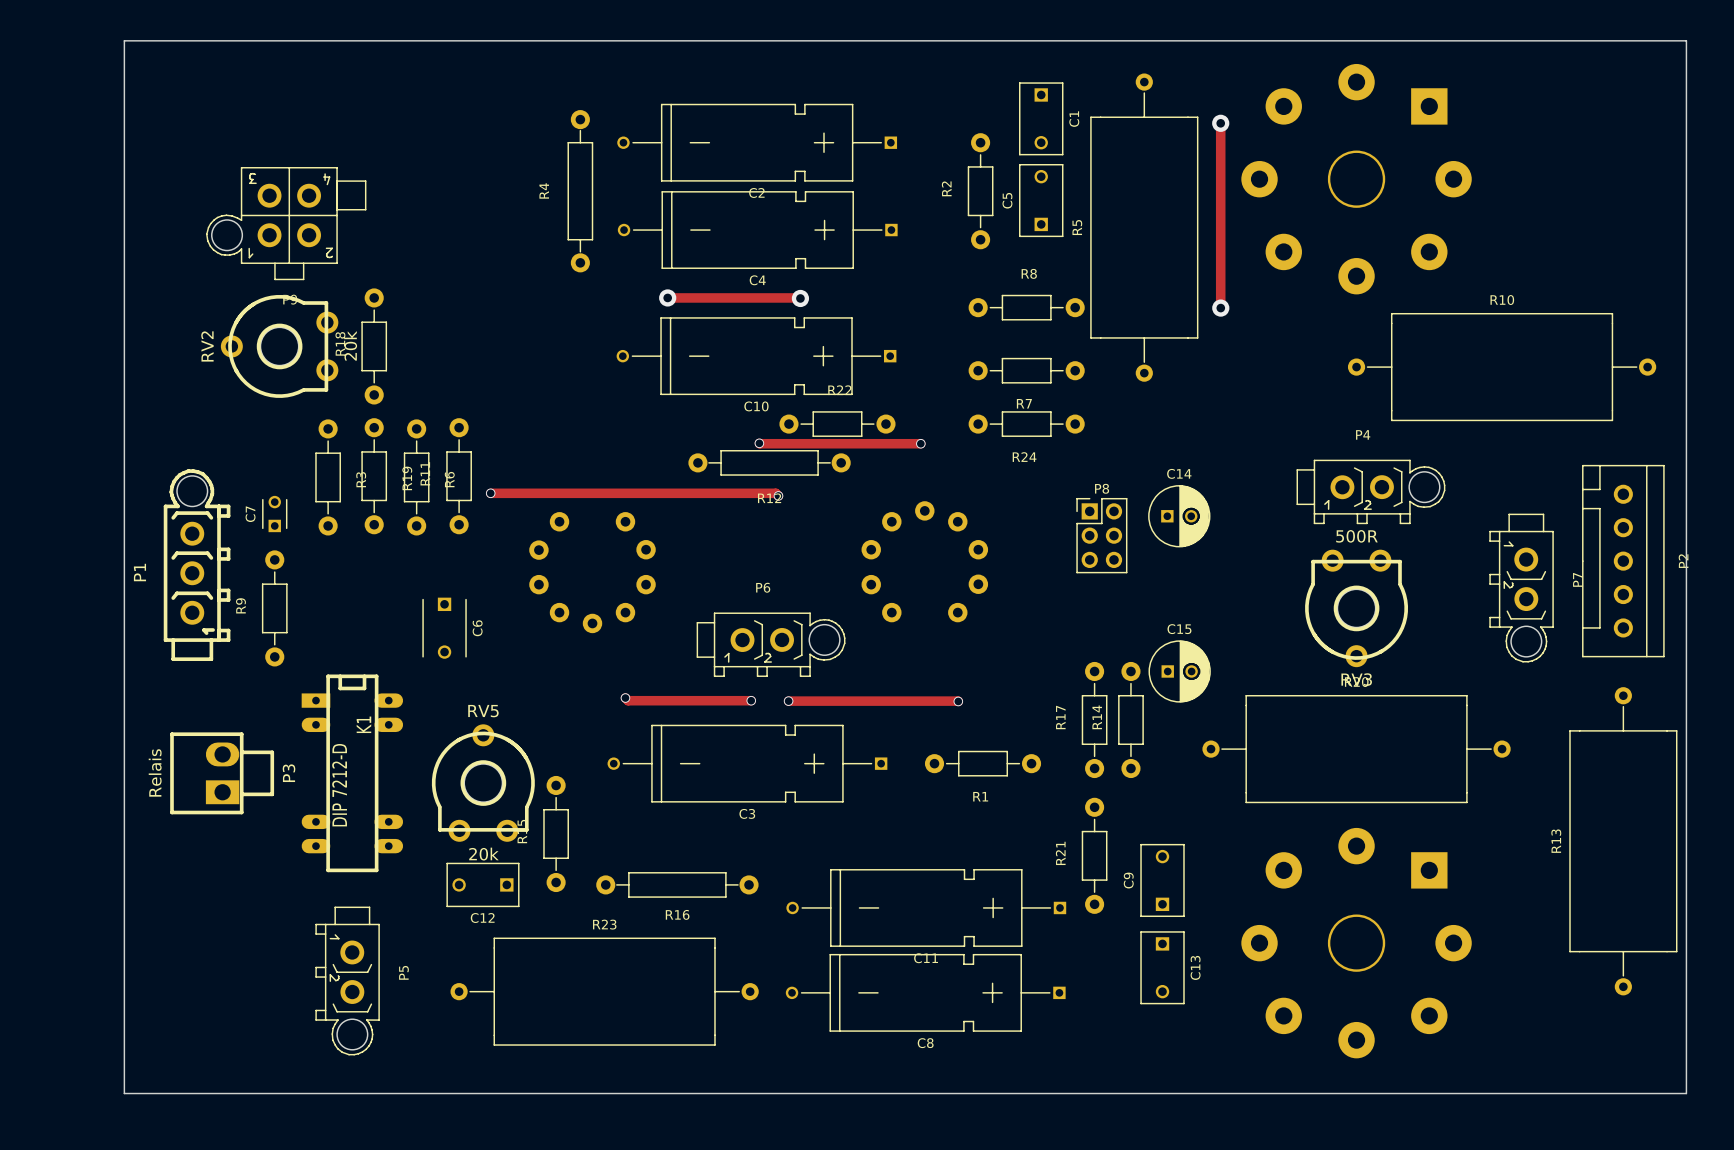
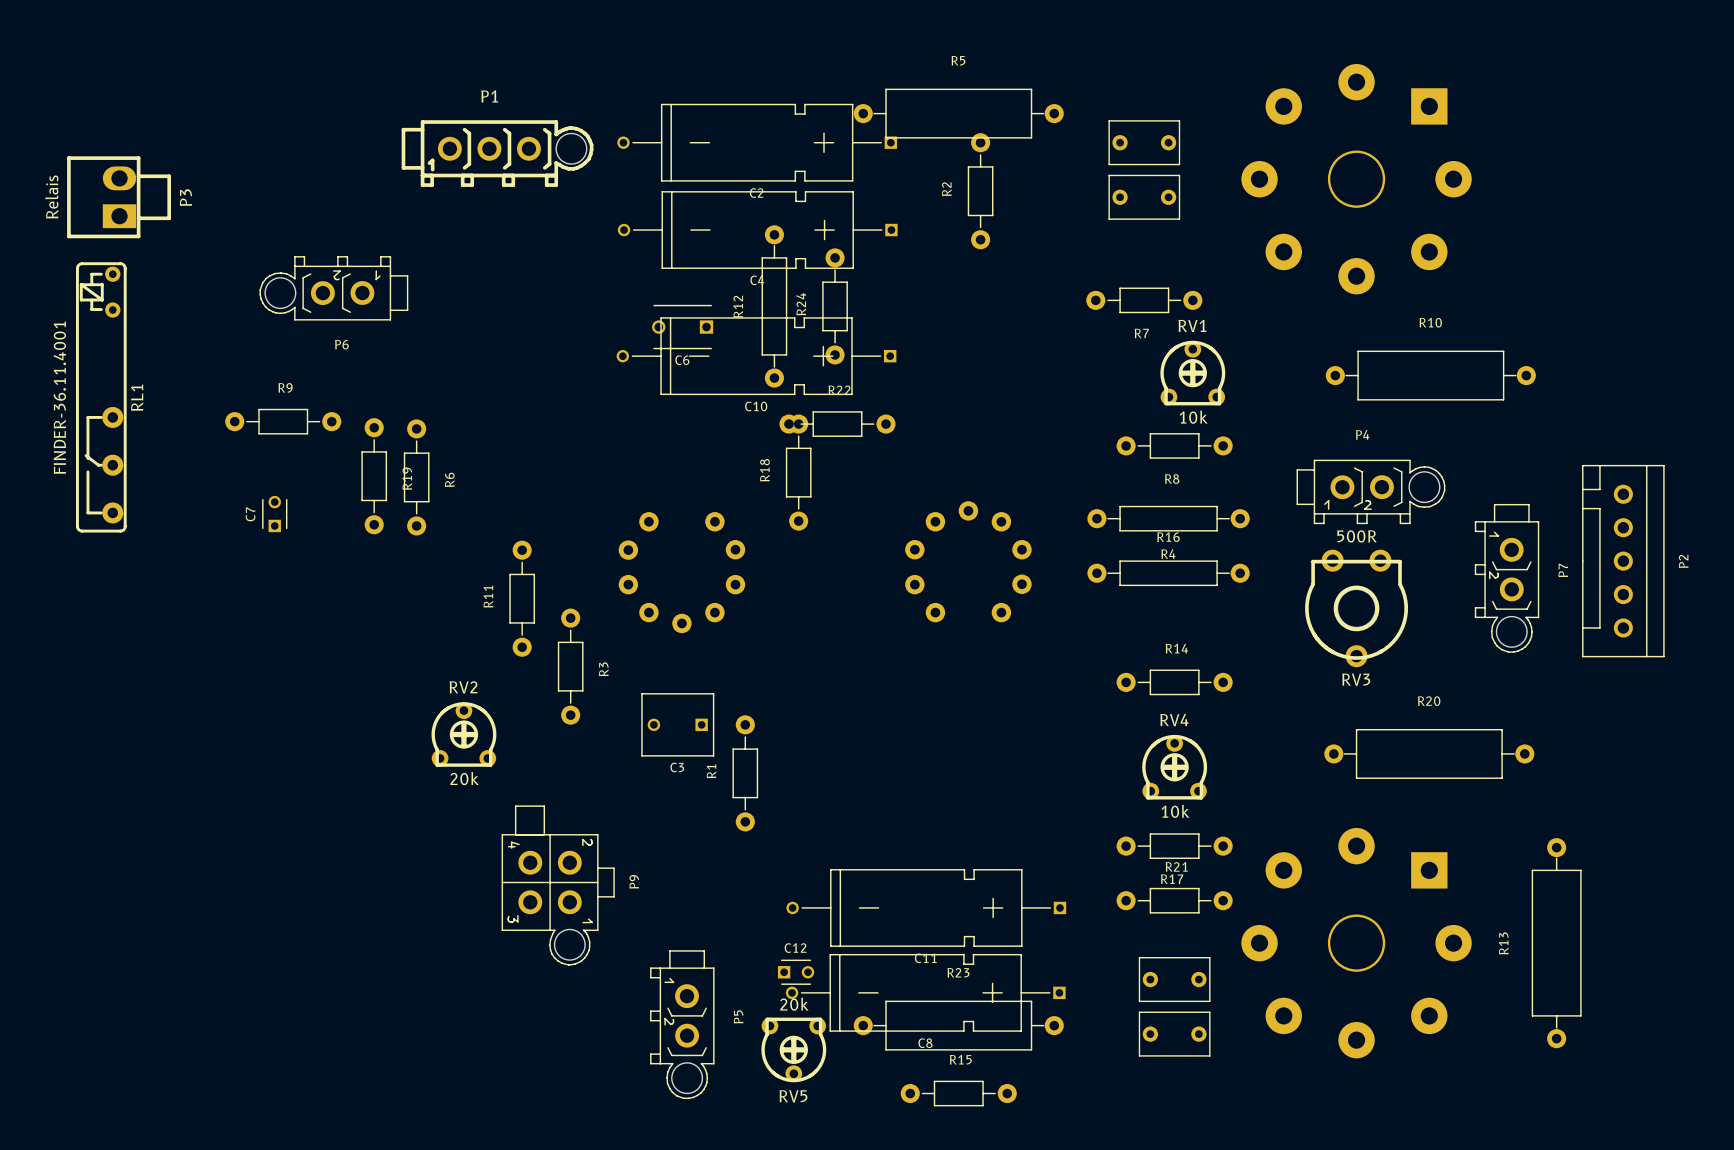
board edge: (124, 40) (1686, 40) (1686, 1093) (124, 1093) (124, 40) -> none
R5 footprint: [1090, 73, 1199, 382] -> [853, 88, 1064, 139]
C1: (1041, 118) -> none
track: (1220, 123) (1220, 308) -> none
via: (1220, 123) -> none
part: none -> (1144, 142)
R4 name position: R4 (544, 190) -> R4 (1168, 554)
R4 rotation: 0° (580, 191) -> 90° clockwise (1168, 518)
R4 position: (580, 191) -> (1168, 518)
part: none -> (1144, 197)
C5: (1041, 200) -> none
P9 rotation: 0° (286, 223) -> 90° counterclockwise (558, 885)
P9 position: (286, 223) -> (558, 885)
R5 name position: R5 (1077, 227) -> R5 (958, 60)
R8 name position: R8 (1029, 273) -> R8 (1172, 479)
RV2 footprint: [220, 295, 339, 398] -> [431, 702, 497, 767]
track: (667, 297) (800, 298) -> none
via: (667, 297) -> none
via: (800, 298) -> none
R8 position: (1026, 307) -> (1174, 445)
via: (1220, 308) -> none
R10 footprint: [1347, 313, 1657, 422] -> [1325, 350, 1536, 401]
RV2 value position: 20k (350, 345) -> 20k (464, 778)
RV2 name position: RV2 (207, 346) -> RV2 (463, 687)
R18 position: (374, 346) -> (798, 472)
R7 position: (1026, 370) -> (1144, 300)
RV1: none -> 10k (1192, 373)
RL1: none -> FINDER-36.11.4001 (101, 397)
R24 rotation: 0° (1026, 424) -> 90° clockwise (835, 306)
R24 position: (1026, 424) -> (835, 306)
track: (759, 443) (920, 443) -> none
via: (759, 443) -> none
via: (920, 443) -> none
R12 rotation: 0° (769, 462) -> 90° clockwise (774, 306)
R12 position: (769, 462) -> (774, 306)
R11 position: (459, 476) -> (522, 598)
R3 position: (328, 477) -> (570, 666)
track: (490, 493) (775, 493) (778, 495) -> none
via: (490, 493) -> none
via: (778, 495) -> none
C14: (1179, 516) -> none
P8: (1101, 535) -> none
part position: (924, 561) -> (968, 561)
P1 rotation: 0° (197, 565) -> 90° clockwise (497, 153)
P1 position: (197, 565) -> (497, 153)
part position: (592, 572) -> (681, 572)
P7 position: (1521, 588) -> (1507, 578)
R9 rotation: 0° (274, 608) -> 90° clockwise (283, 421)
R9 position: (274, 608) -> (283, 421)
C6 rotation: 0° (444, 628) -> 90° clockwise (682, 327)
C6 position: (444, 628) -> (682, 327)
P6 rotation: 0° (771, 644) -> 180° (333, 288)
P6 position: (771, 644) -> (333, 288)
C15: (1179, 671) -> none
R13 footprint: [1569, 687, 1678, 996] -> [1531, 838, 1582, 1049]
R20 footprint: [1202, 695, 1511, 804] -> [1324, 728, 1535, 779]
track: (625, 698) (628, 700) (751, 700) -> none
via: (625, 698) -> none
via: (751, 700) -> none
track: (788, 701) (958, 701) -> none
via: (788, 701) -> none
via: (958, 701) -> none
RV5 name position: RV5 (483, 711) -> RV5 (793, 1096)
R17 name position: R17 (1060, 717) -> R17 (1172, 879)
R17 rotation: 0° (1094, 719) -> 90° clockwise (1174, 846)
R17 position: (1094, 719) -> (1174, 846)
R14 rotation: 0° (1130, 719) -> 90° clockwise (1174, 682)
RV5 footprint: [431, 724, 535, 842] -> [761, 1017, 827, 1083]
C3 footprint: [607, 724, 888, 803] -> [641, 693, 715, 757]
R1 rotation: 0° (983, 763) -> 90° clockwise (745, 773)
R1 position: (983, 763) -> (745, 773)
RV4: none -> 10k (1174, 767)
P3 position: (222, 773) -> (119, 197)
K1: DIP 7212-D (352, 773) -> none
R15 rotation: 0° (556, 833) -> 90° clockwise (958, 1093)
R15 position: (556, 833) -> (958, 1093)
RV5 value position: 20k (483, 854) -> 20k (794, 1004)
R21 rotation: 0° (1094, 855) -> 90° clockwise (1174, 900)
R21 position: (1094, 855) -> (1174, 900)
C12 footprint: [446, 862, 520, 908] -> [777, 959, 815, 985]
C9: (1162, 880) -> none
R16 position: (677, 884) -> (1168, 573)
R16 name position: R16 (677, 914) -> R16 (1168, 537)
C12 name position: C12 (482, 918) -> C12 (795, 948)
R23 footprint: [450, 937, 759, 1046] -> [853, 1000, 1064, 1051]
C13: (1162, 967) -> none
part: none -> (1174, 979)
P5 position: (347, 980) -> (682, 1024)
part: none -> (1174, 1034)

